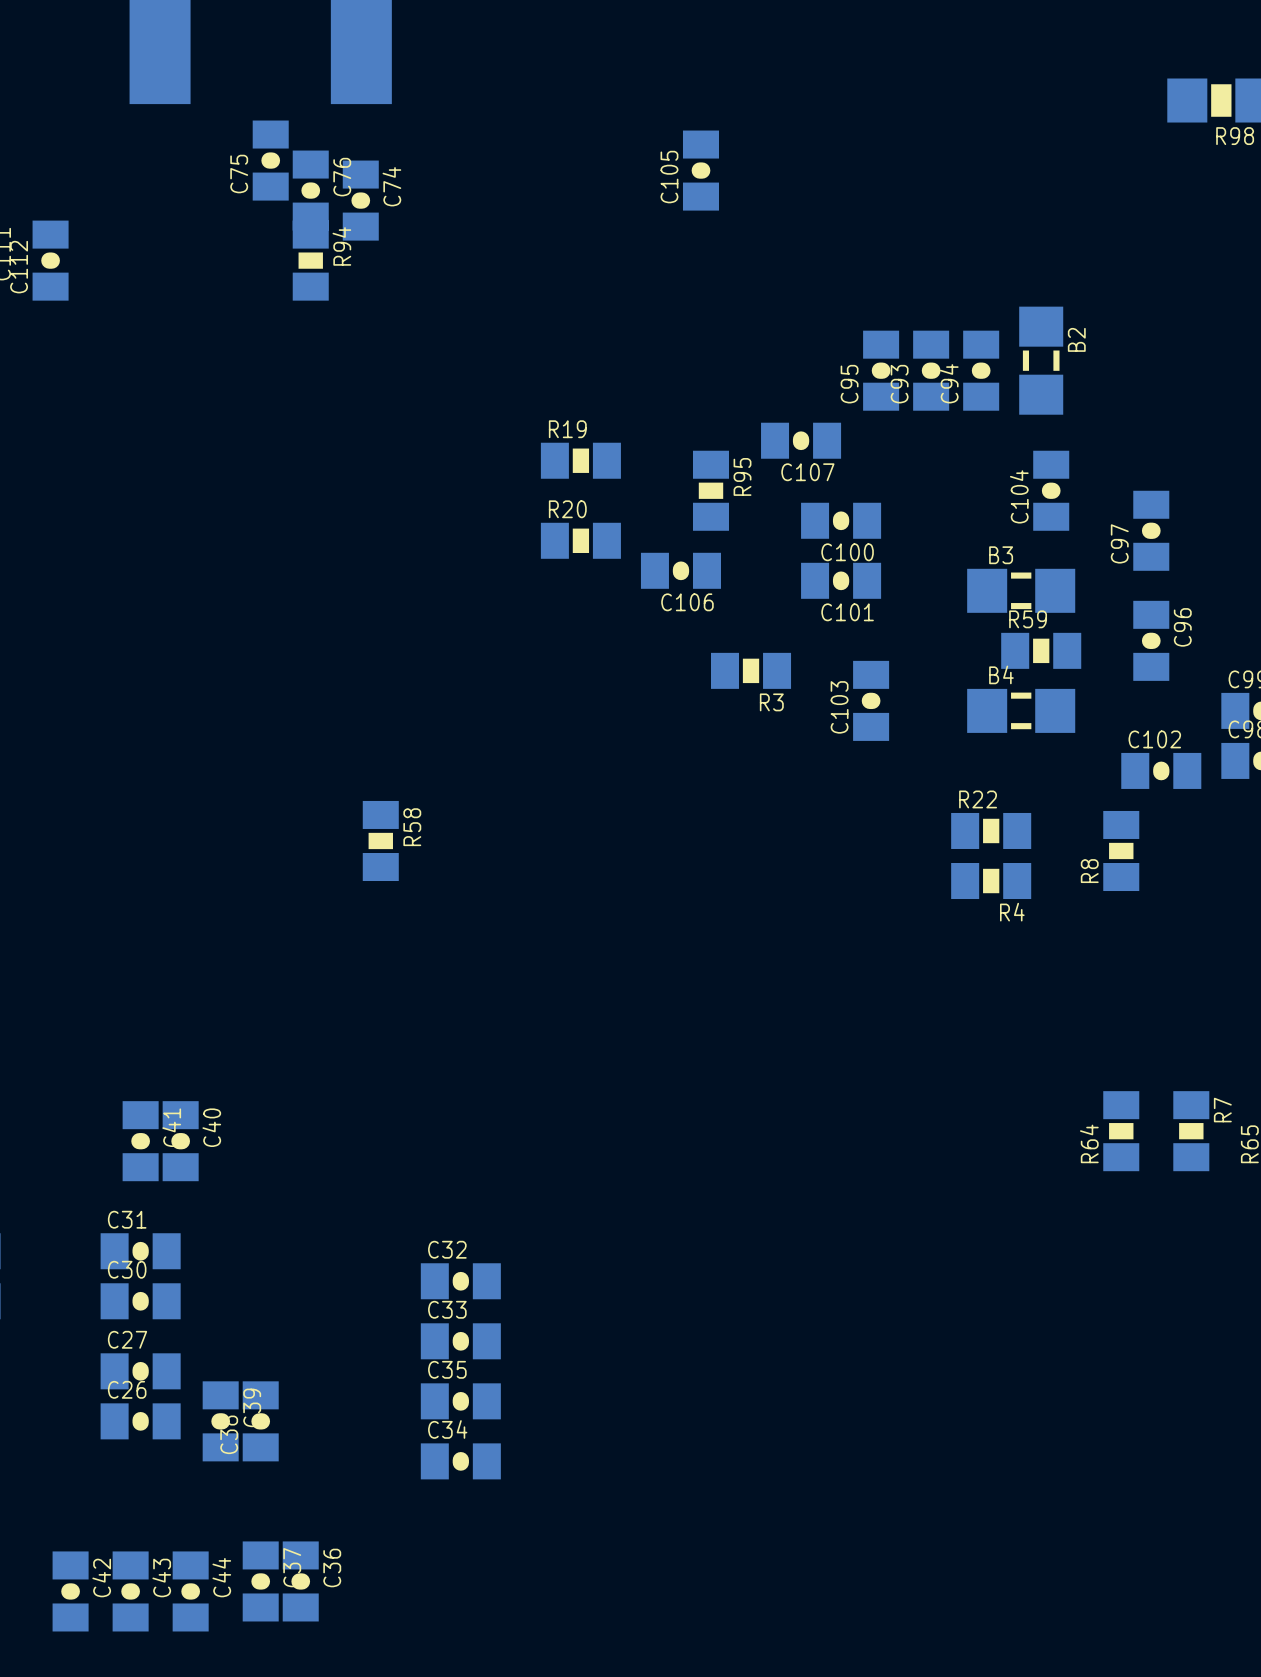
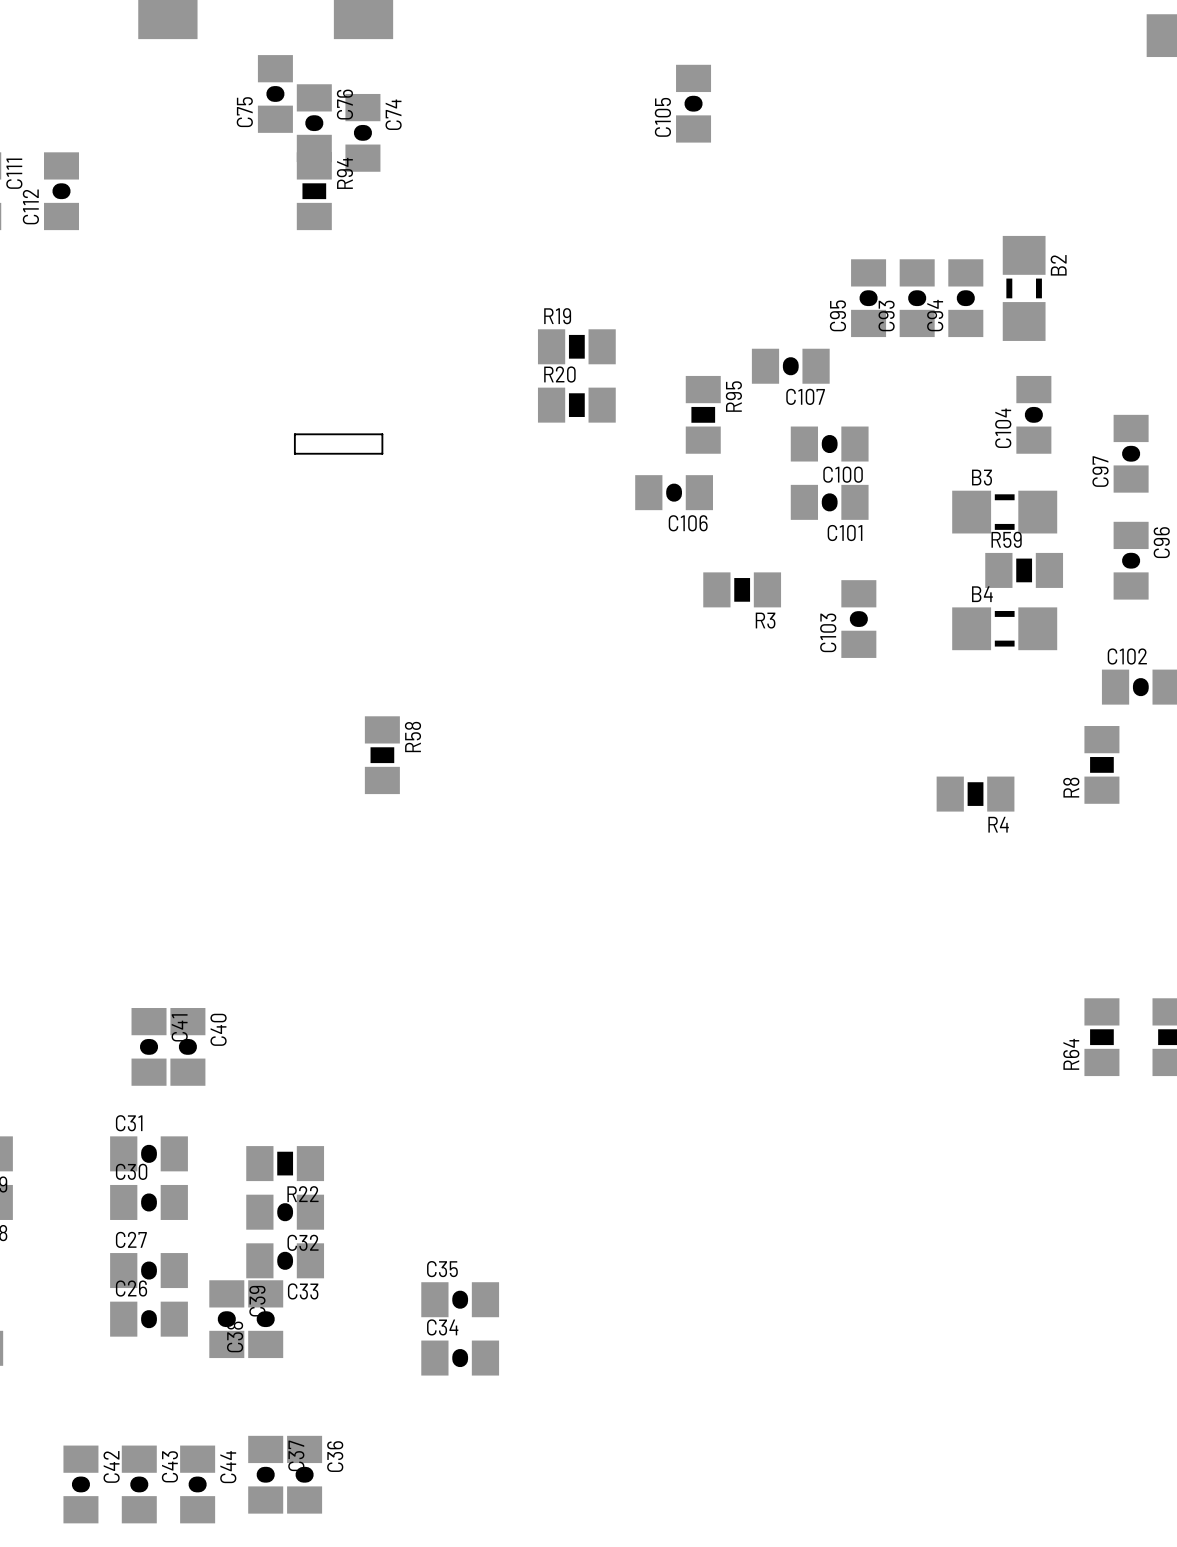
R19 position: (580, 460) -> (576, 346)
board edge: none -> (382, 434) (294, 434) (294, 453) (382, 453) (382, 434)
R20 position: (580, 540) -> (576, 405)
R22 name position: R22 (978, 799) -> R22 (302, 1194)
R22 position: (991, 830) -> (285, 1163)
C32 name position: C32 (447, 1249) -> C32 (303, 1242)
C32 position: (460, 1281) -> (285, 1212)
C33 name position: C33 (447, 1309) -> C33 (303, 1291)
C33 position: (460, 1341) -> (285, 1260)

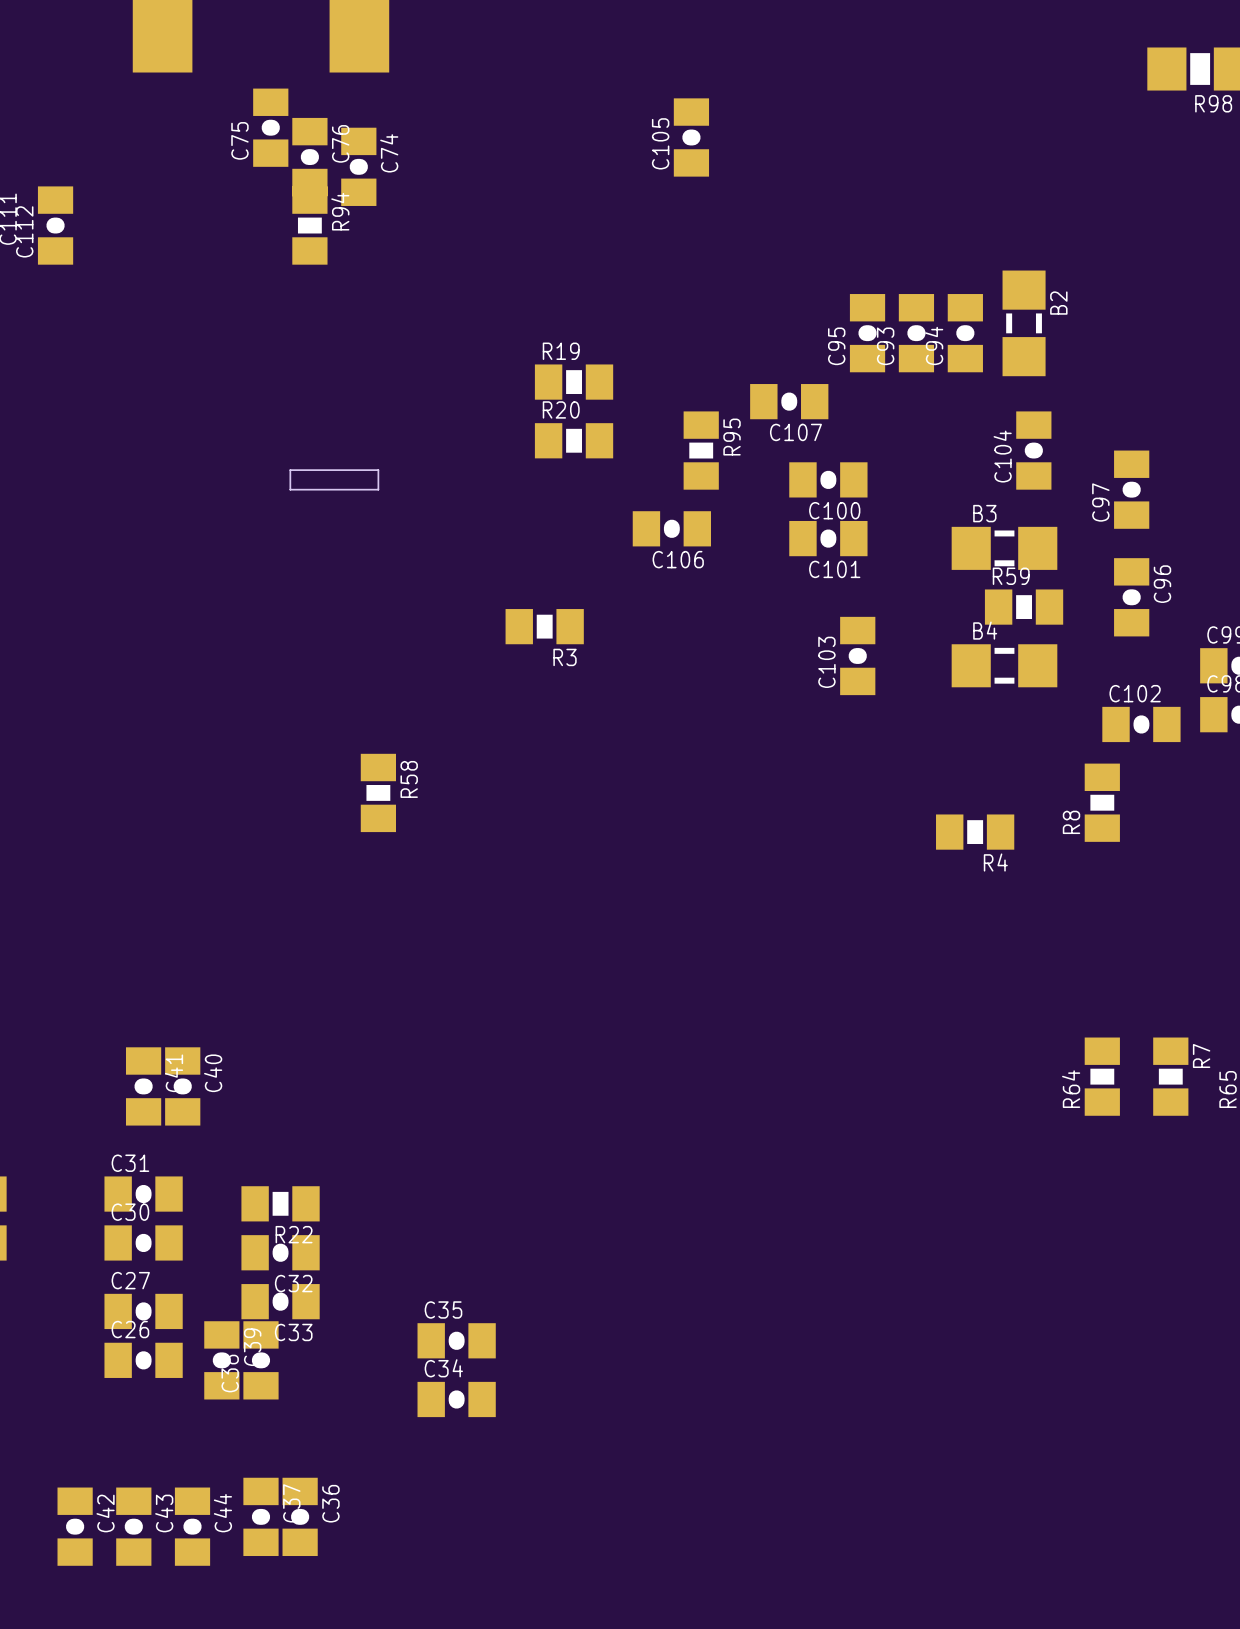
R3 position: (742, 589) -> (544, 626)

